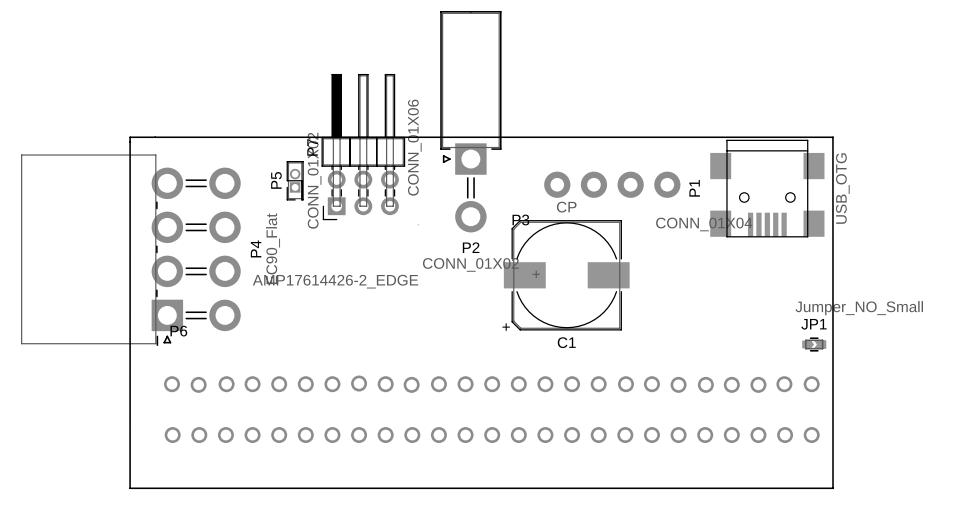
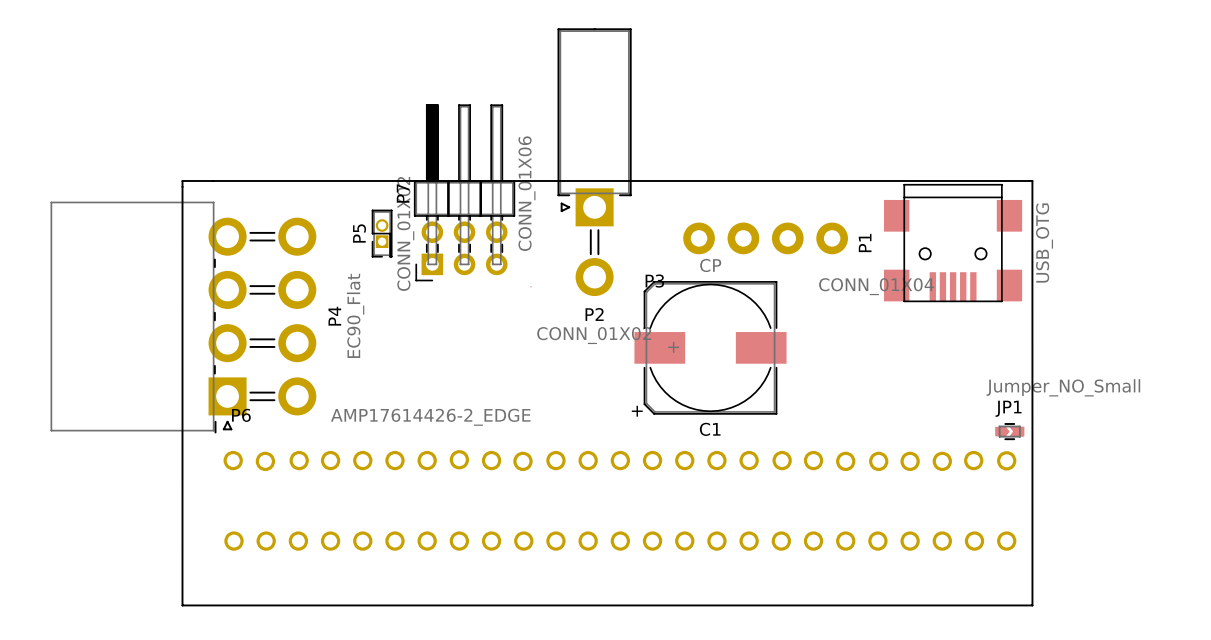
P6 value position: AMP17614426-2_EDGE (335, 281) -> AMP17614426-2_EDGE (430, 417)
P6 footprint: [164, 375, 820, 444] -> [223, 450, 1017, 551]

